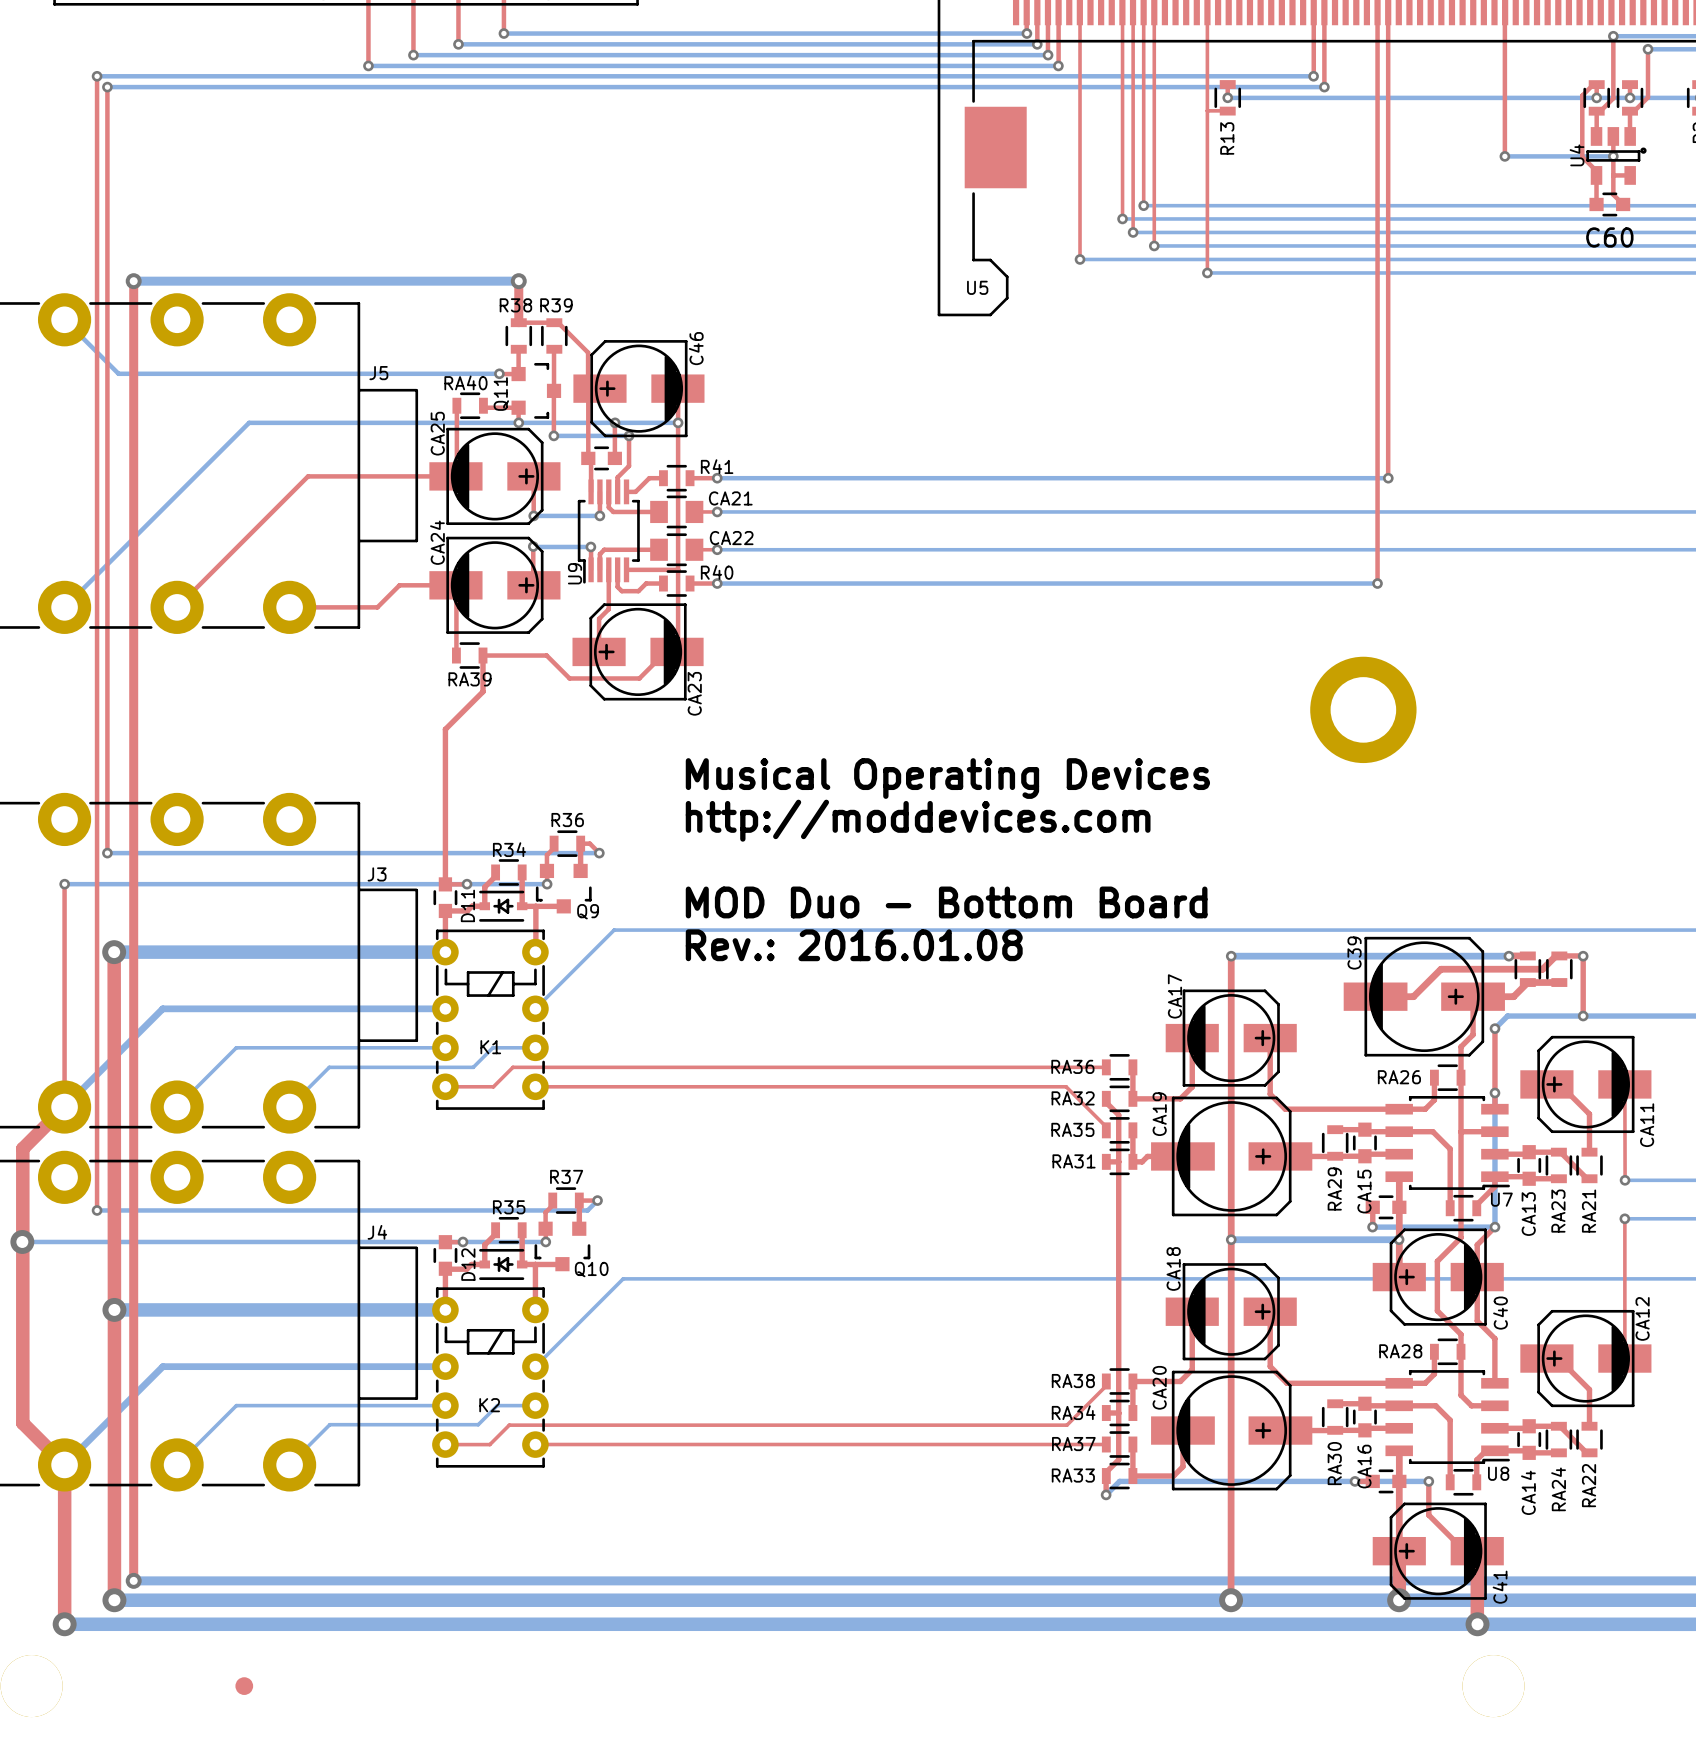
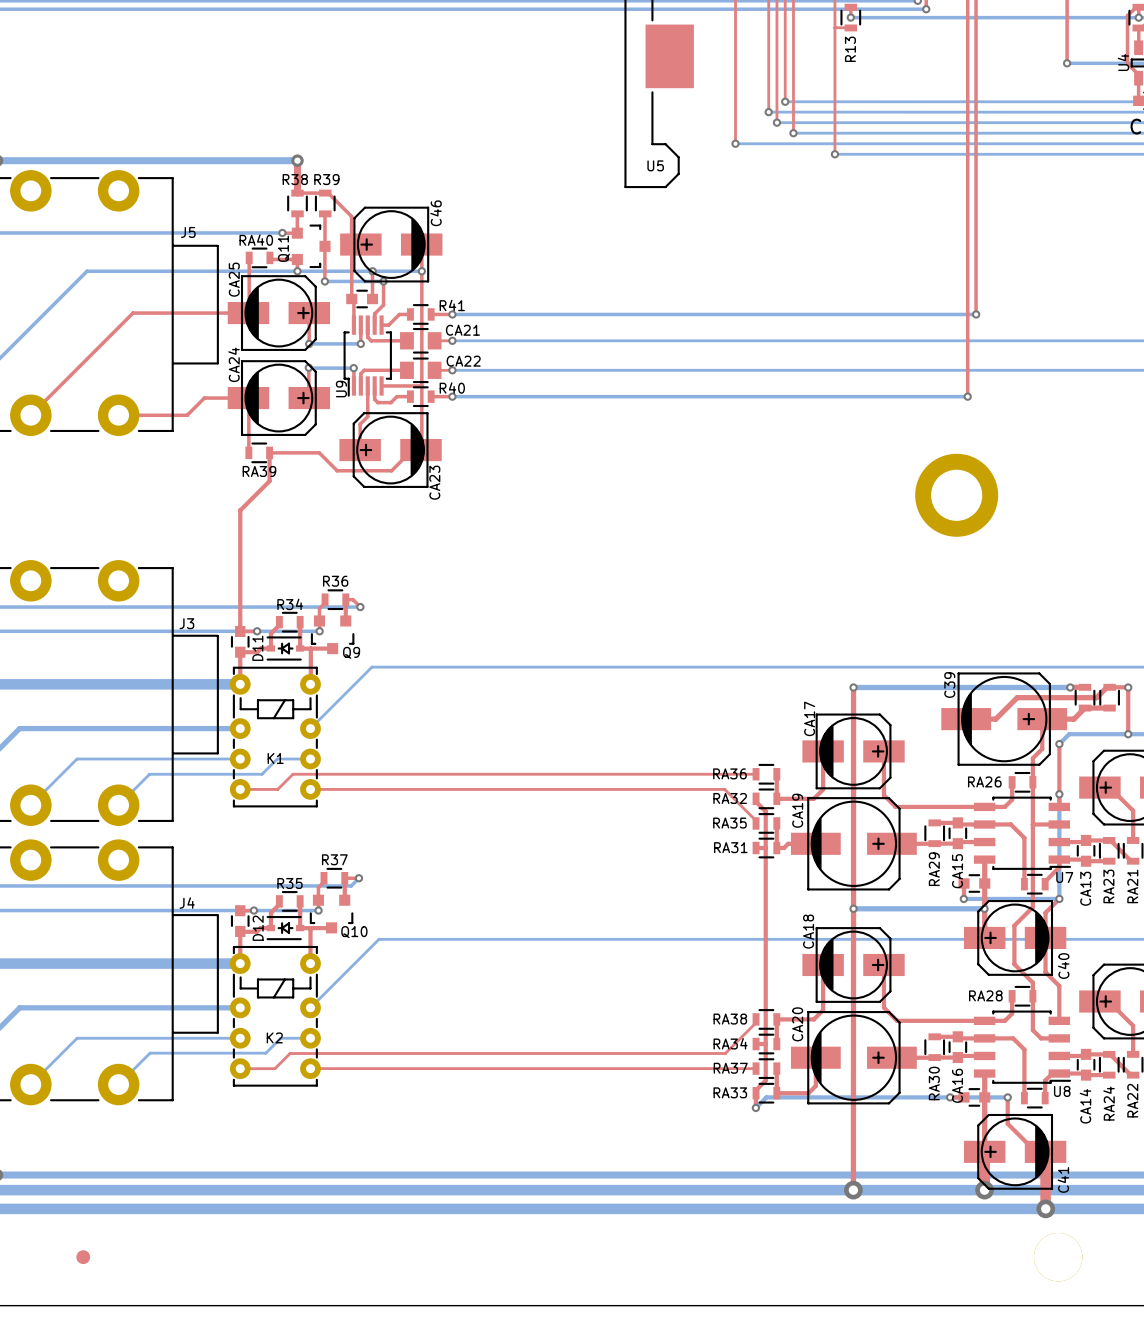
text: Musical Operating Devices (947, 778) -> none
text: http://moddevices.com (918, 820) -> none
text: MOD Duo - Bottom Board (946, 902) -> none
text: Rev.: 2016.01.08 (854, 945) -> none

